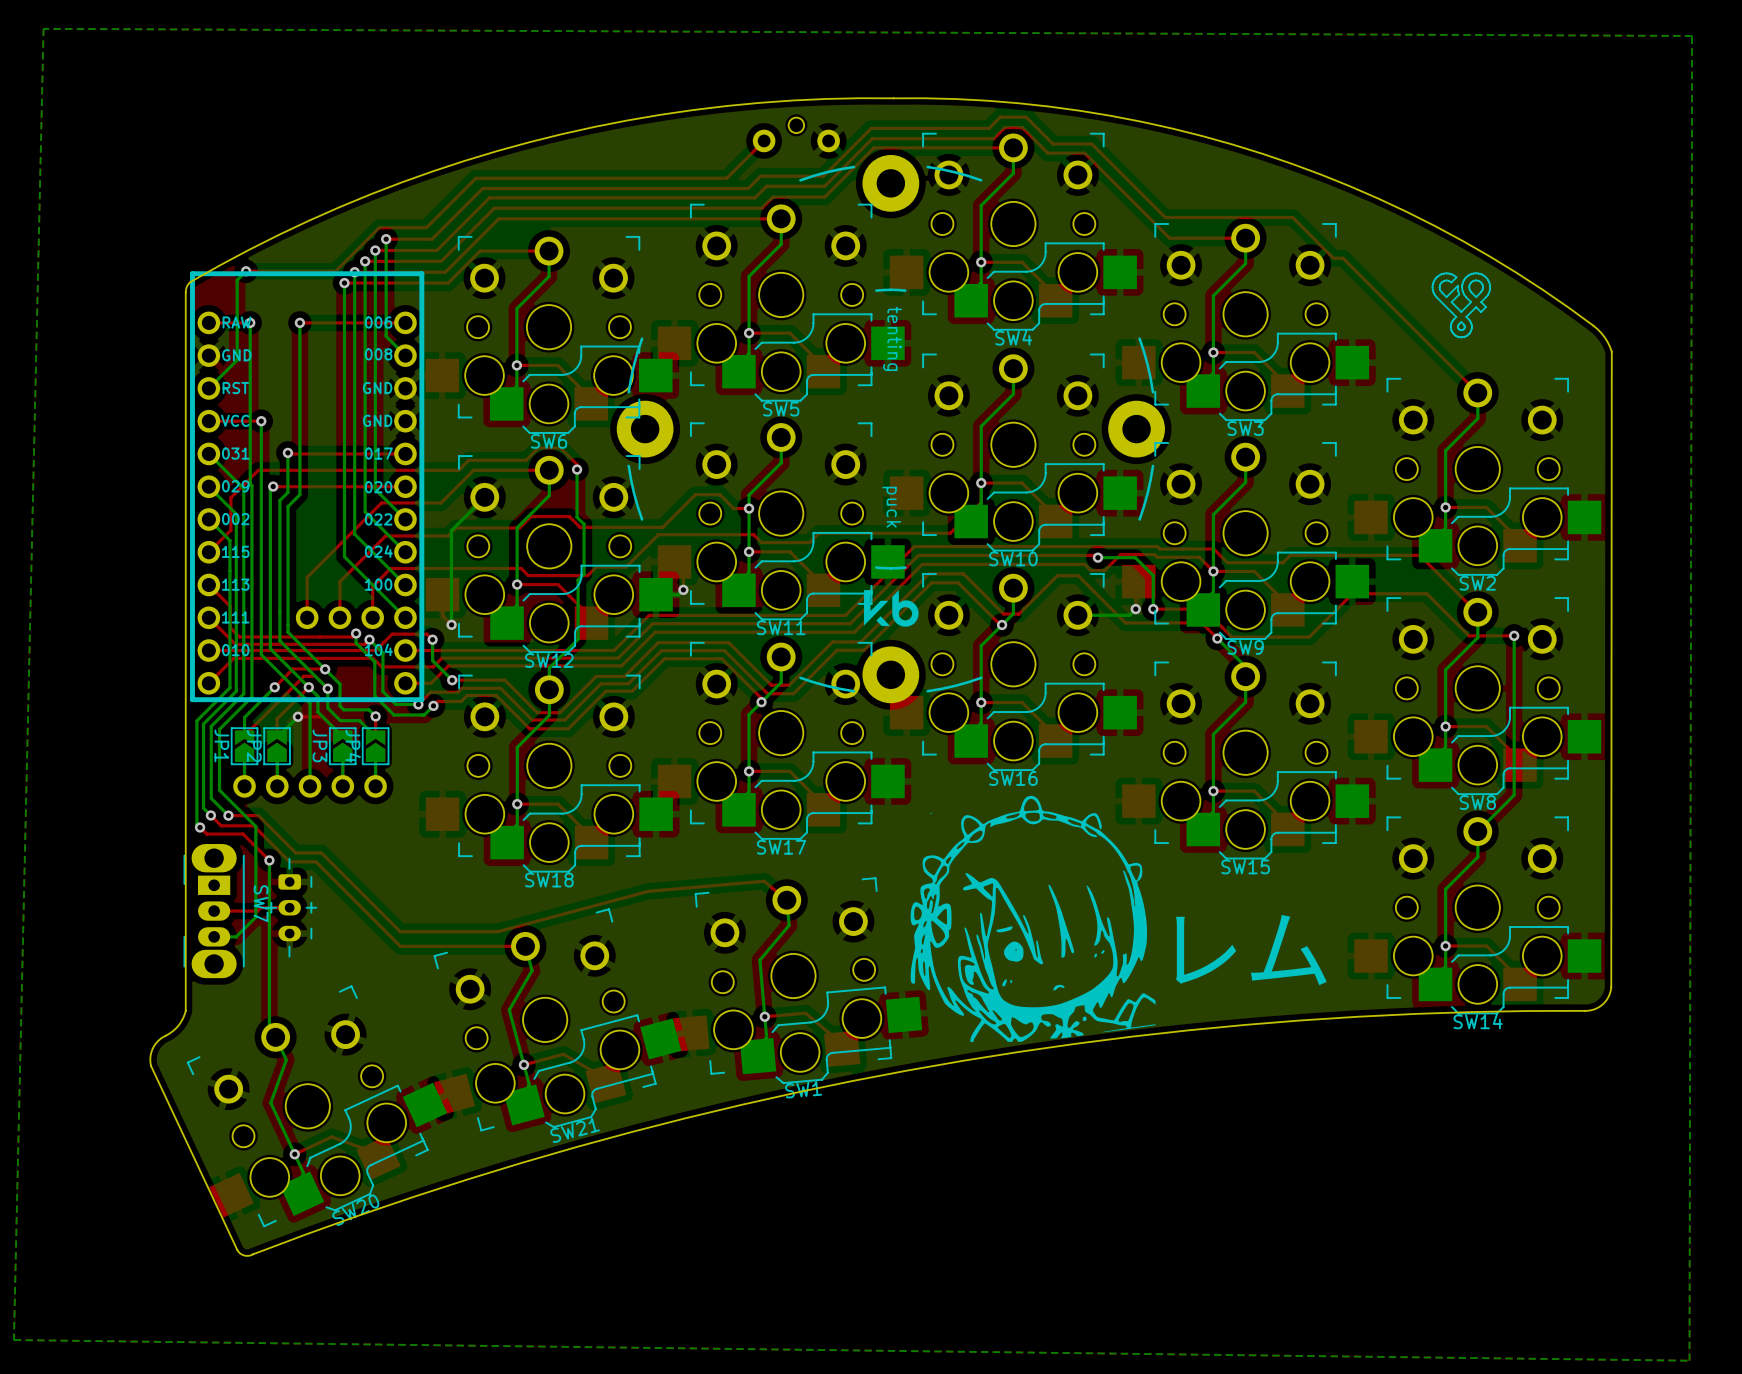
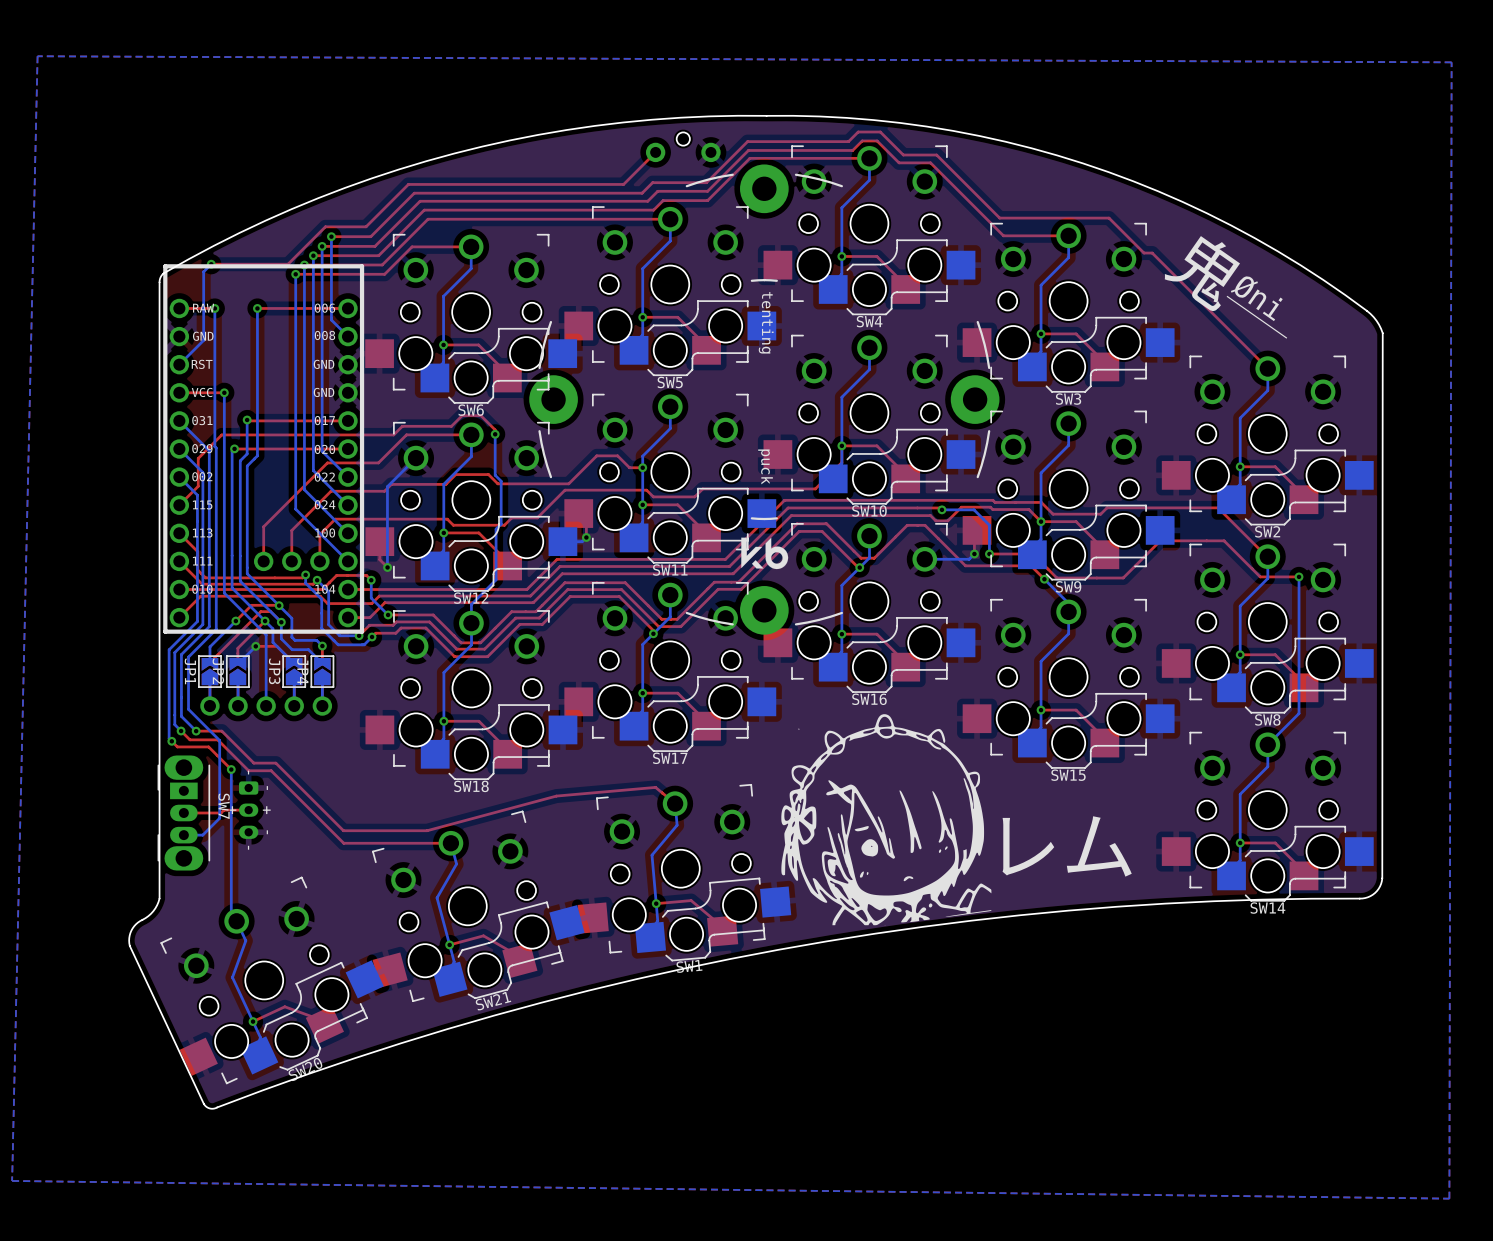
drawing: [1432, 273, 1491, 338] -> none
text: none -> 鬼 (1202, 274)
text: none -> Øni (1256, 298)
text: none -> ____ (1256, 317)

